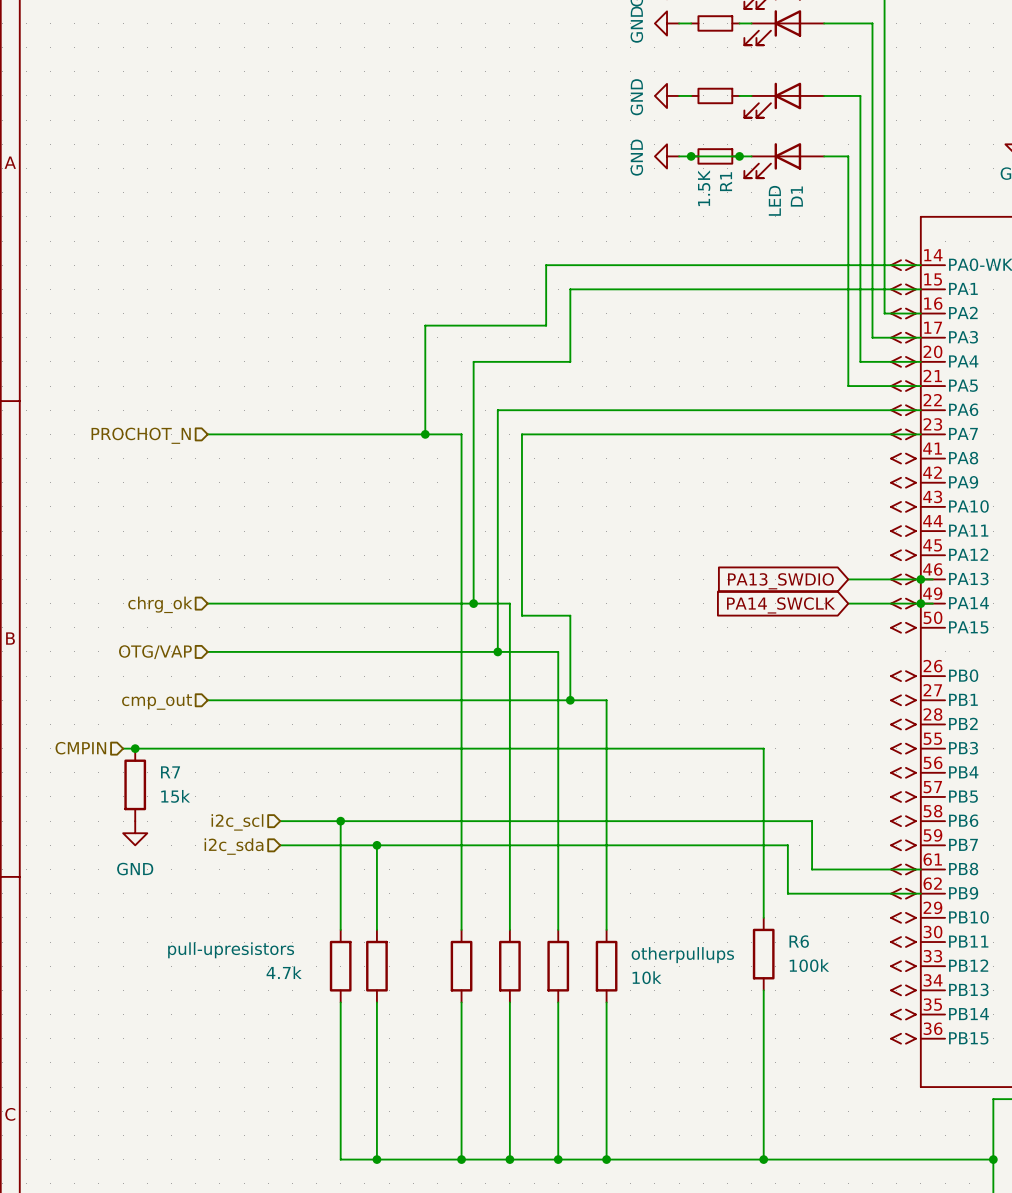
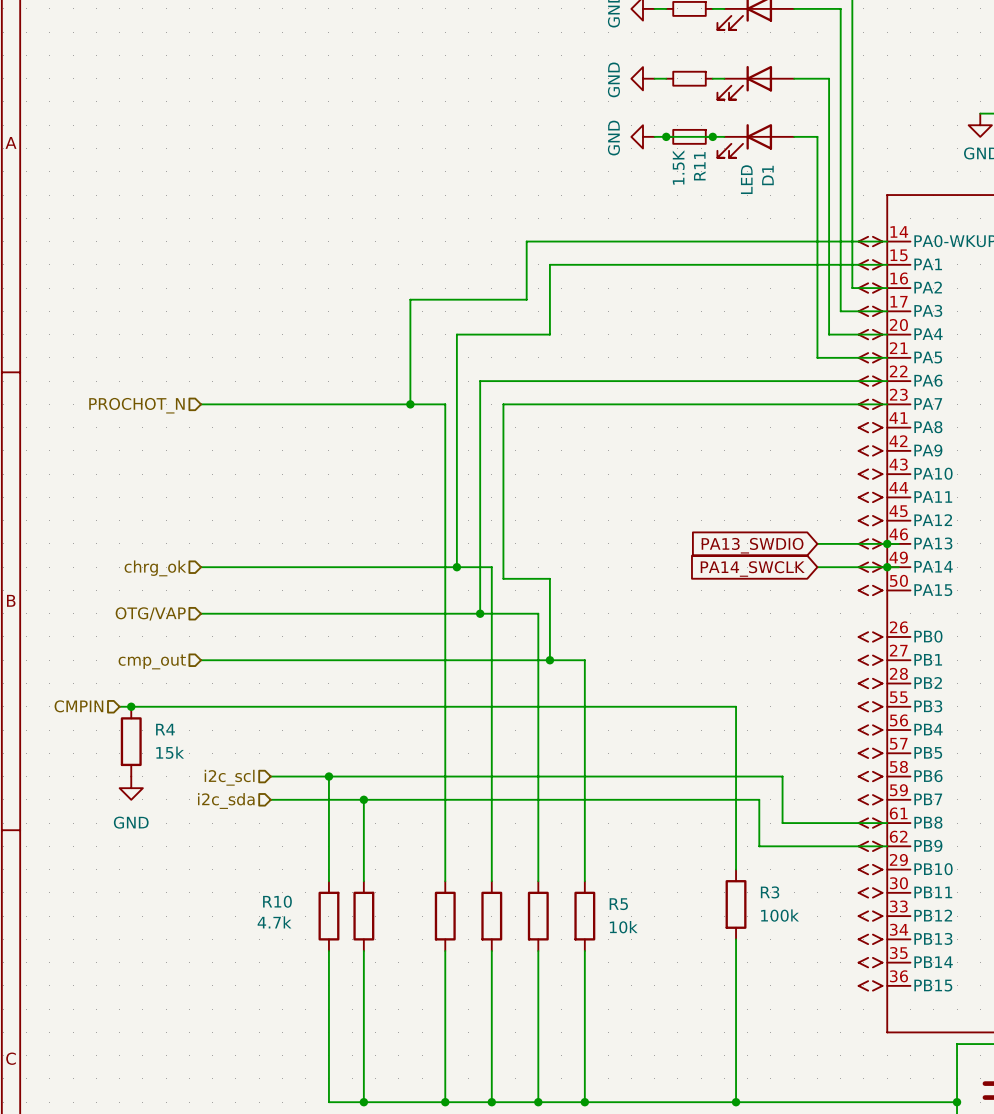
R1 name: R1 (726, 181) -> R11 (699, 166)
R7 name: R7 (170, 772) -> R4 (165, 729)
R6 name: R6 (799, 941) -> R3 (770, 892)
pull-upresistors name: pull-upresistors (231, 950) -> R10 (277, 901)
otherpullups name: otherpullups (682, 955) -> R5 (618, 904)

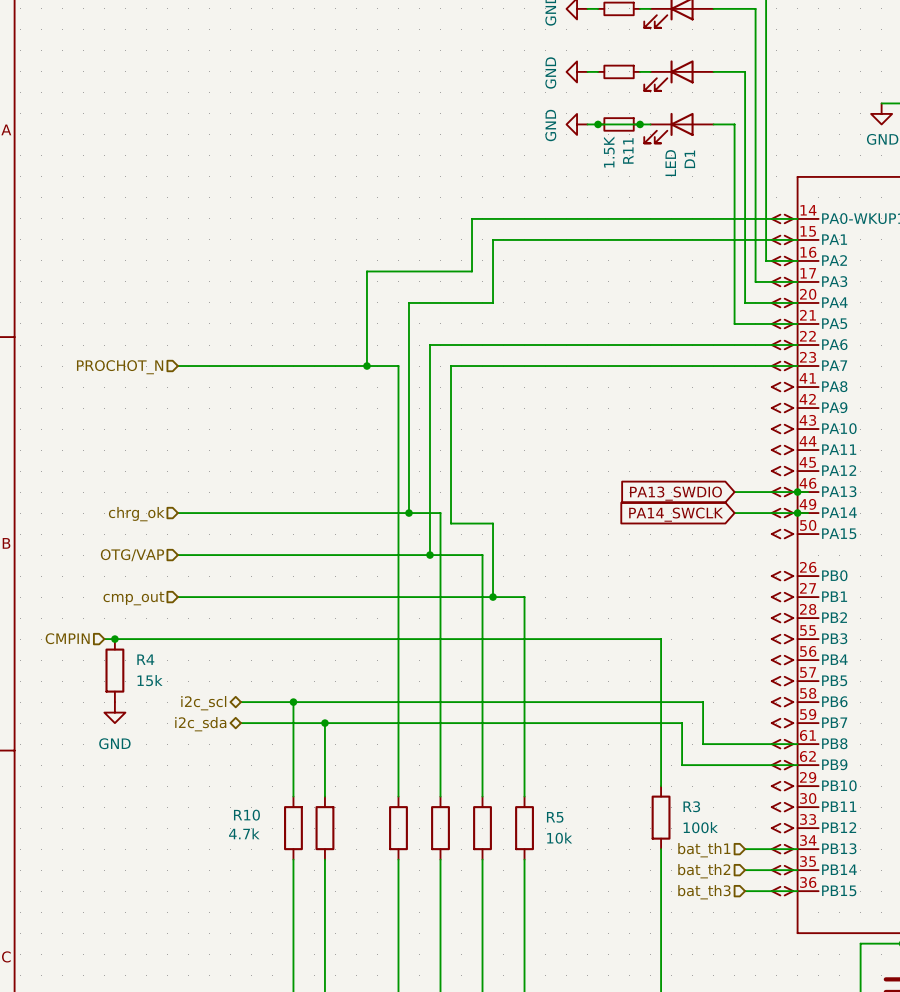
hierarchical label shape: input (229, 777) -> bidirectional (203, 703)
hierarchical label shape: input (226, 801) -> bidirectional (200, 724)
wire: none -> (745, 849) (797, 849)
hierarchical label: none -> bat_th1 (704, 850)
wire: none -> (745, 870) (797, 870)
hierarchical label: none -> bat_th2 (704, 871)
wire: none -> (745, 891) (797, 891)
hierarchical label: none -> bat_th3 (704, 892)

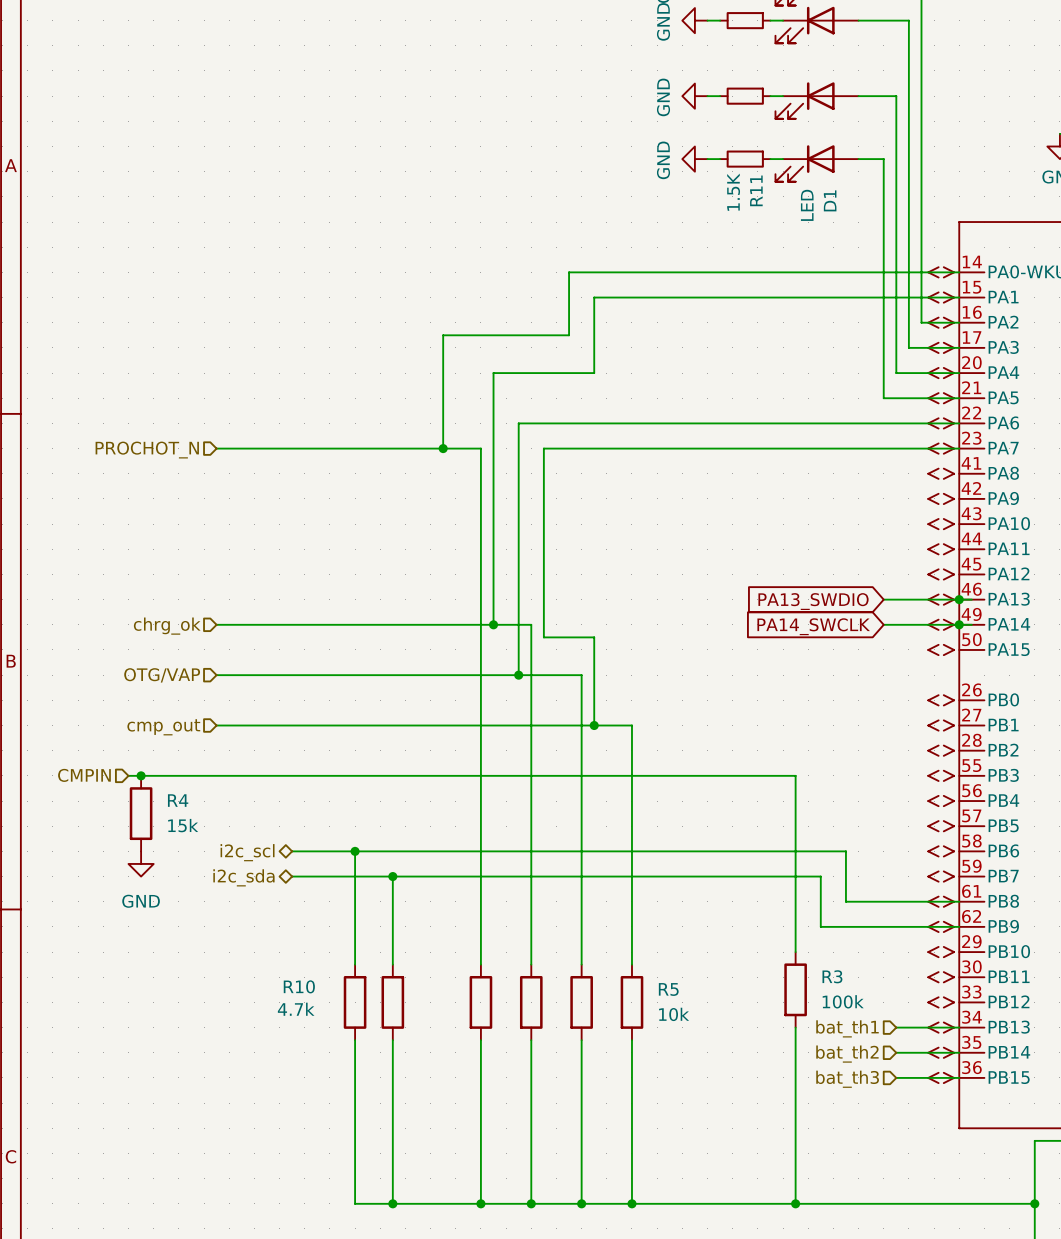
wire: (598, 124) (640, 124) -> none
junction: (598, 124) -> none
junction: (640, 124) -> none

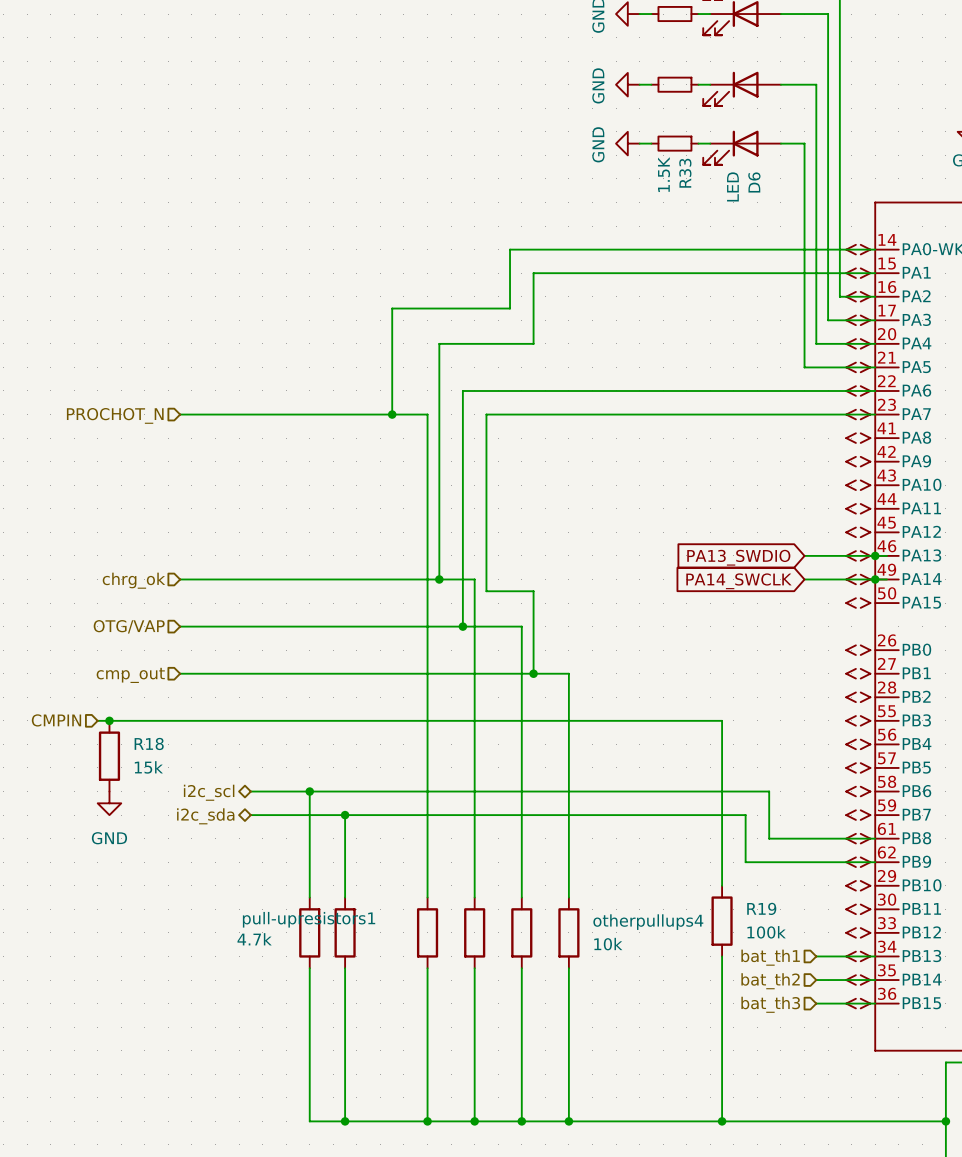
R11 name: R11 (756, 190) -> R33 (685, 173)
D1 name: D1 (830, 200) -> D6 (754, 182)
R4 name: R4 (178, 800) -> R18 (149, 743)
R3 name: R3 (832, 976) -> R19 (761, 908)
R10 name: R10 (299, 986) -> pull-upresistors1 (309, 919)
R5 name: R5 (668, 989) -> otherpullups4 (648, 922)

